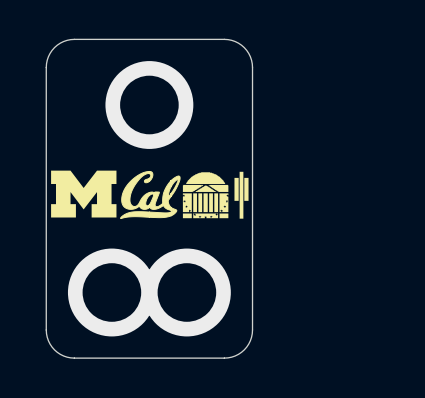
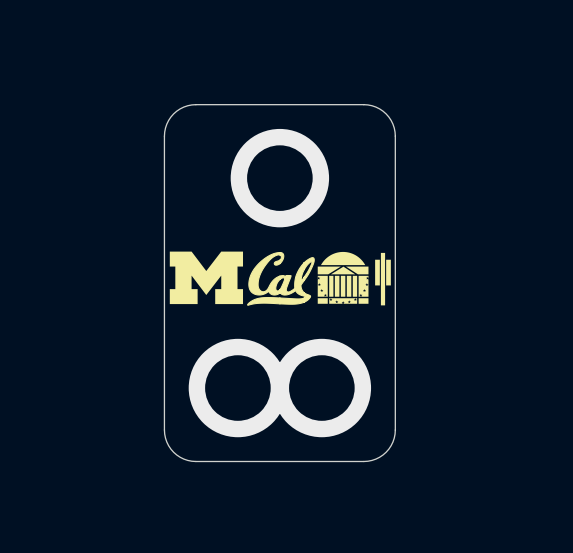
drawing shape: [182, 172, 229, 219] -> [317, 251, 369, 304]

